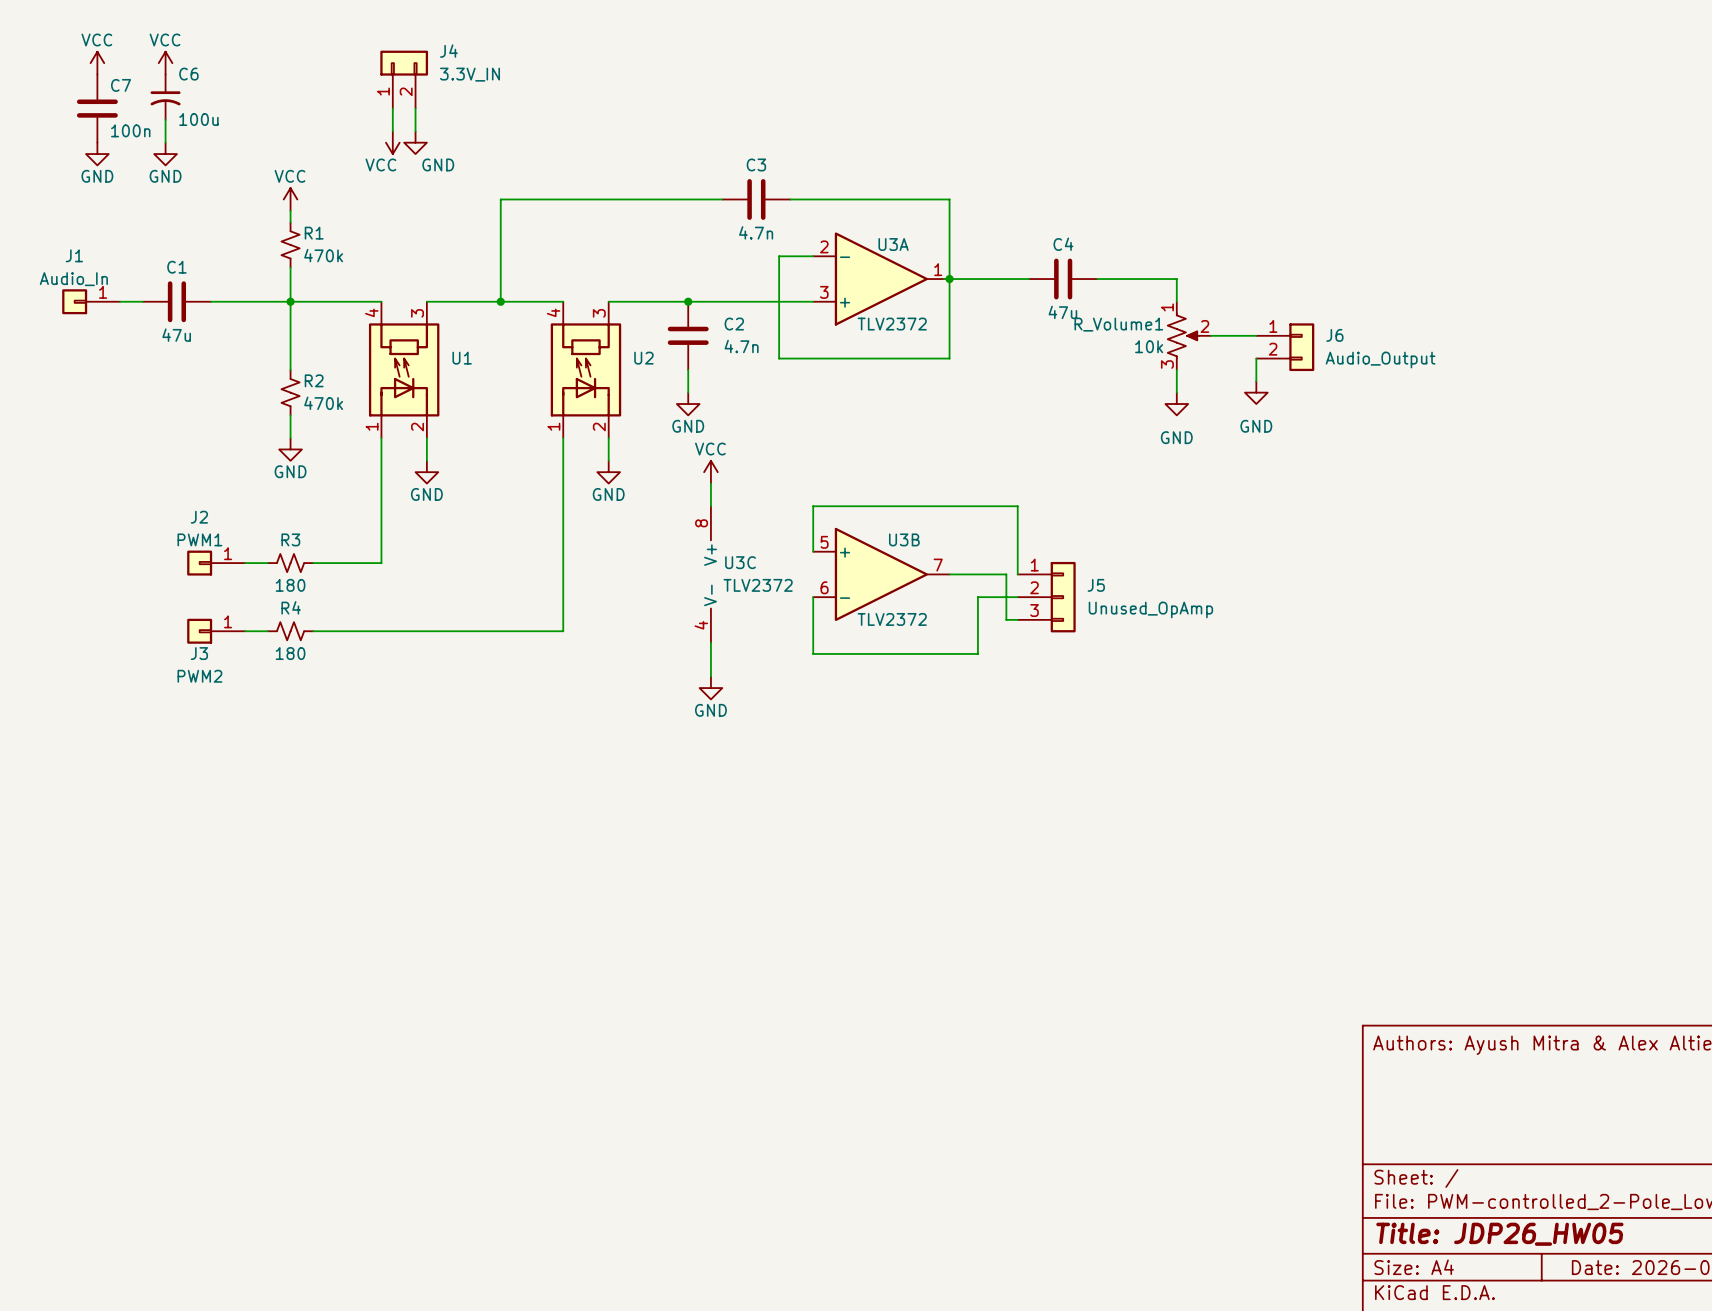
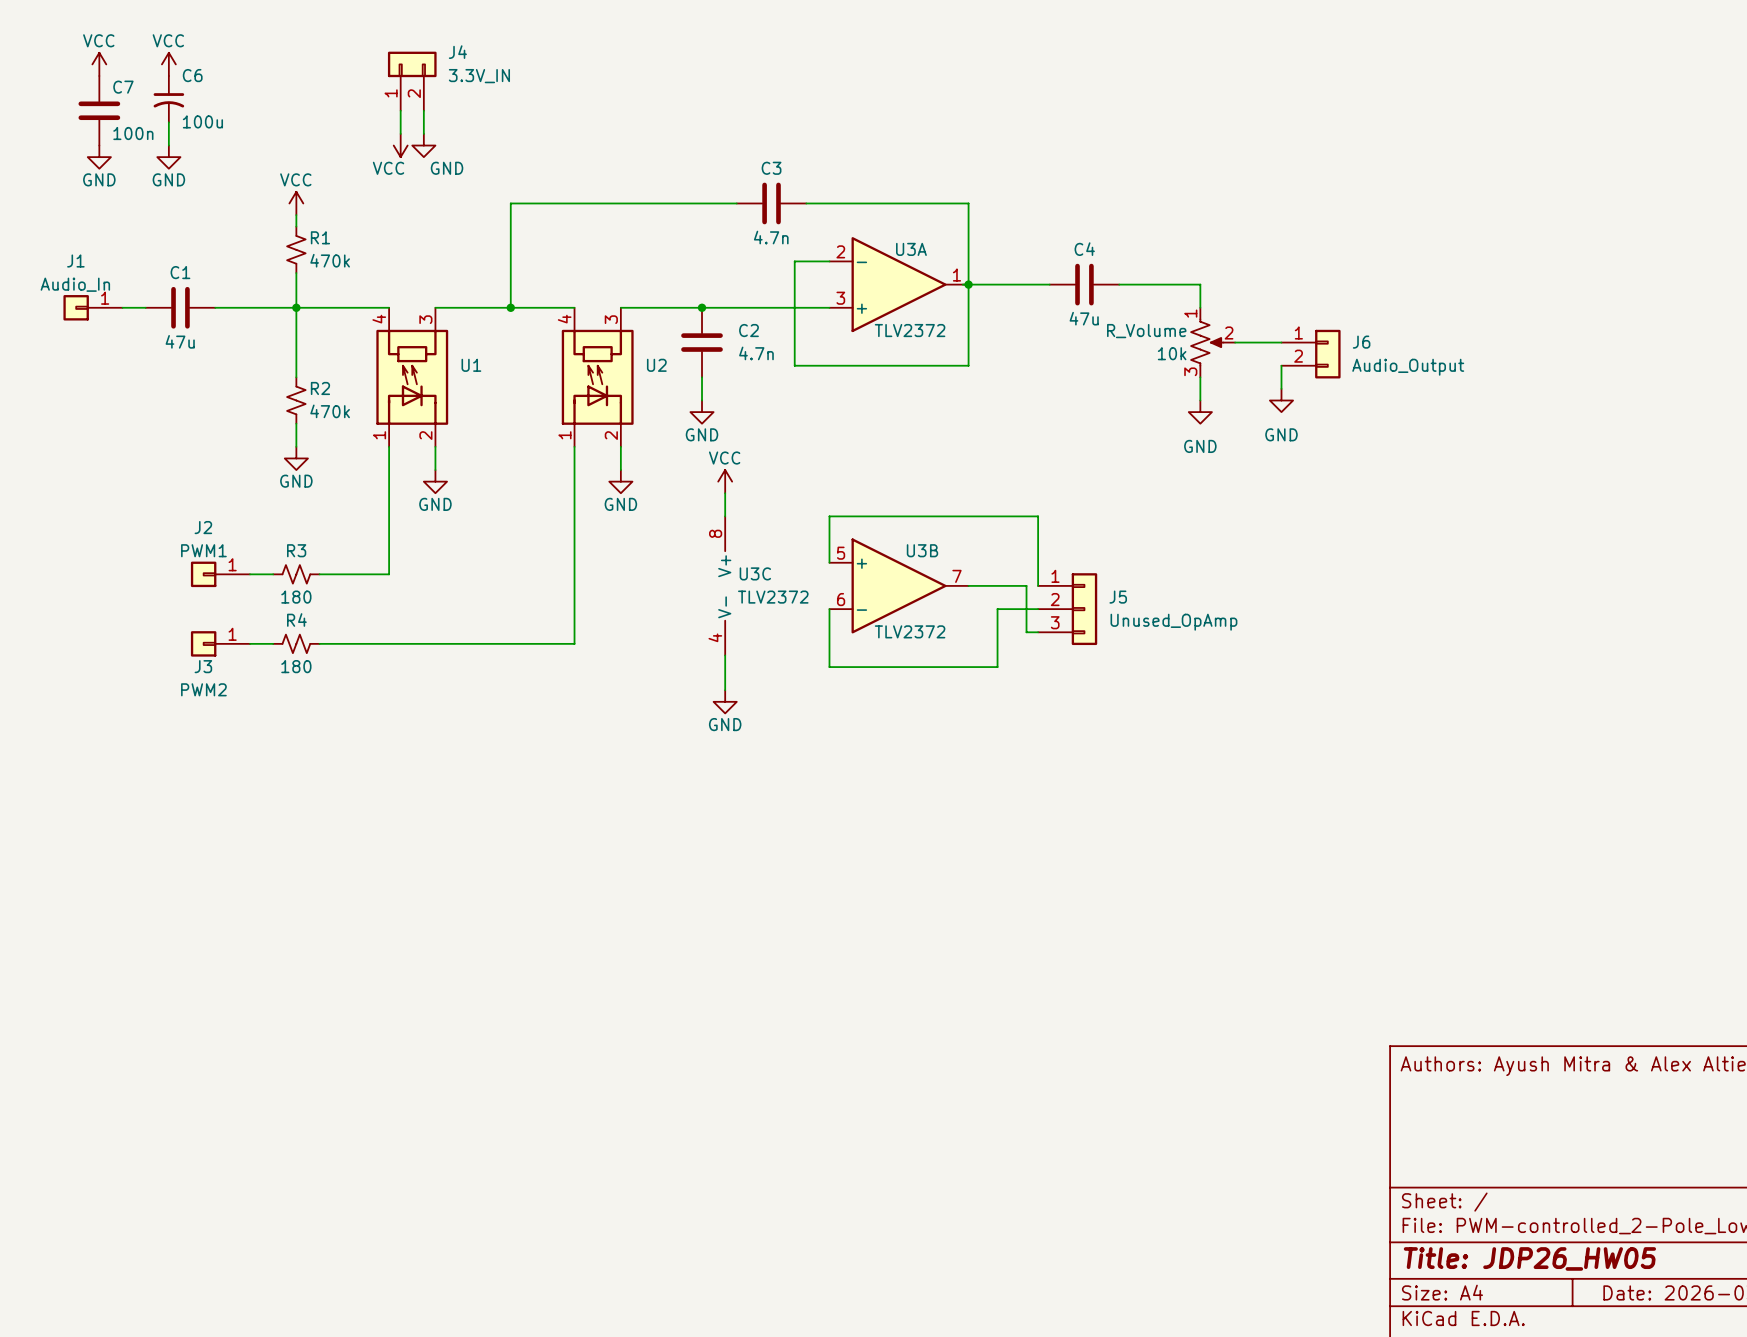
R_Volume1 name: R_Volume1 (1118, 324) -> R_Volume (1146, 331)

